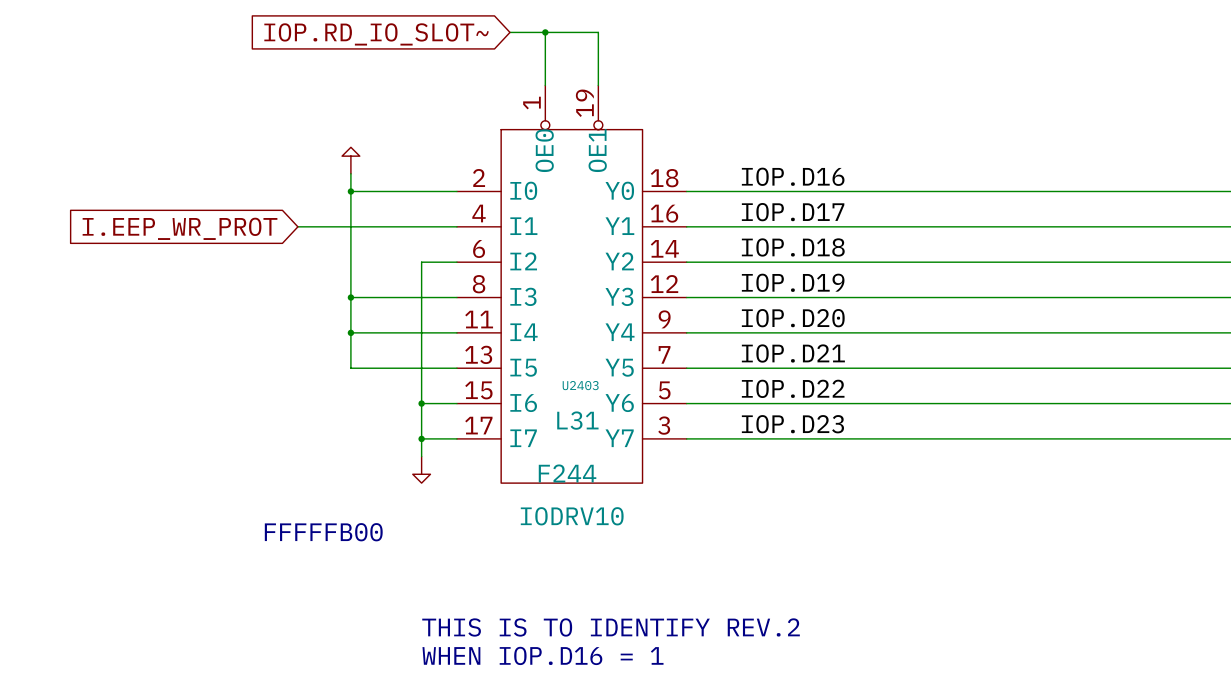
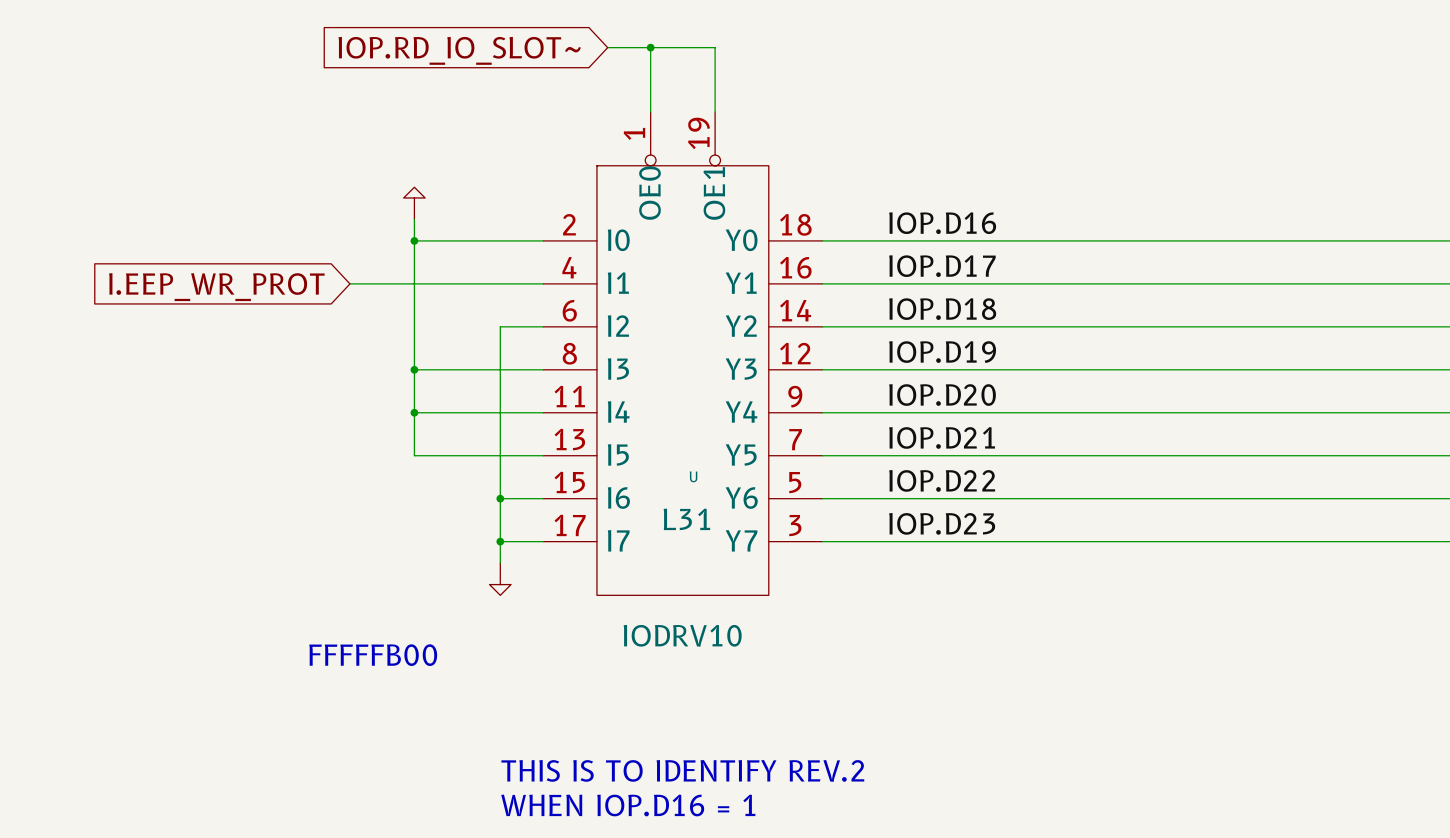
U2403 name: U2403 (580, 385) -> U (693, 476)
U2403 value: F244 (567, 473) -> none

